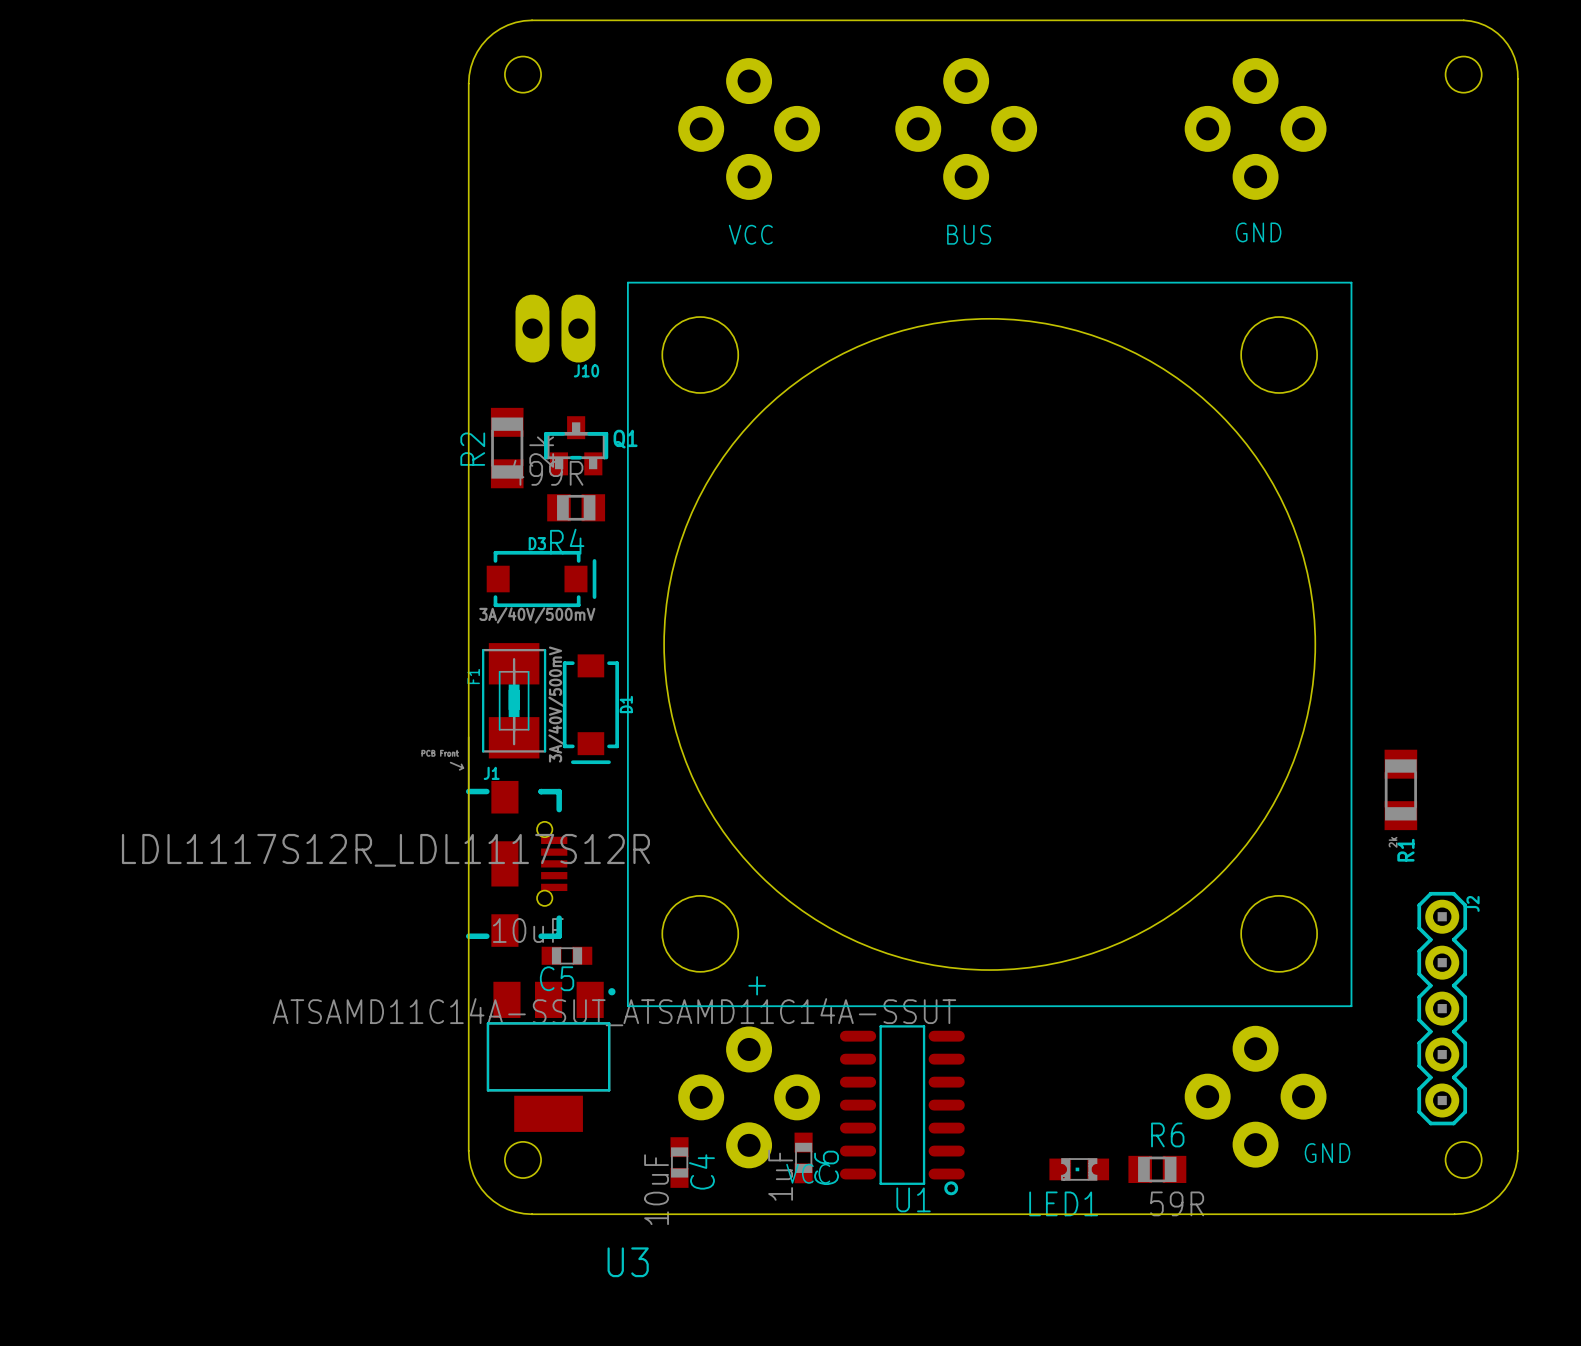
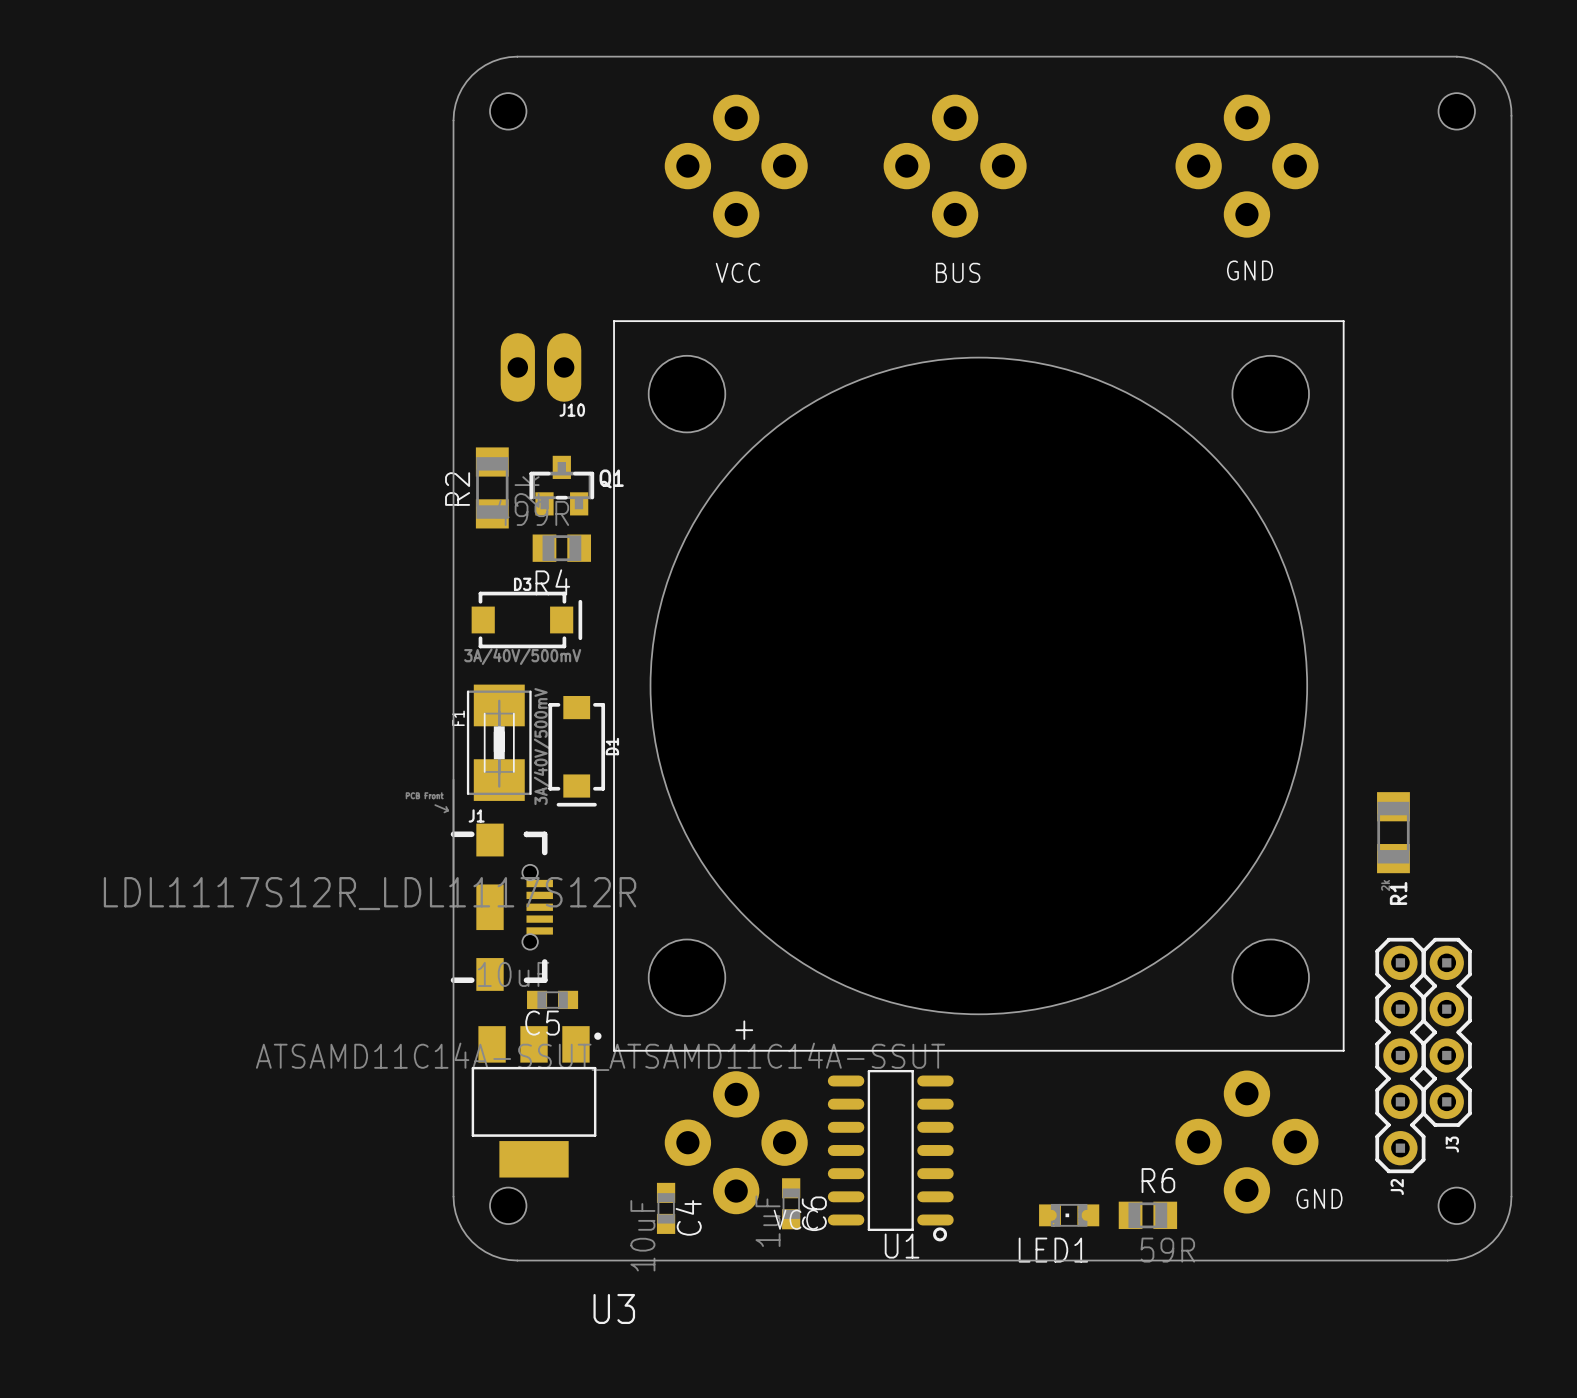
J2 name position: J2 (1473, 903) -> J2 (1397, 1187)
J3: none -> (1446, 1032)
J2 position: (1442, 1008) -> (1400, 1055)

